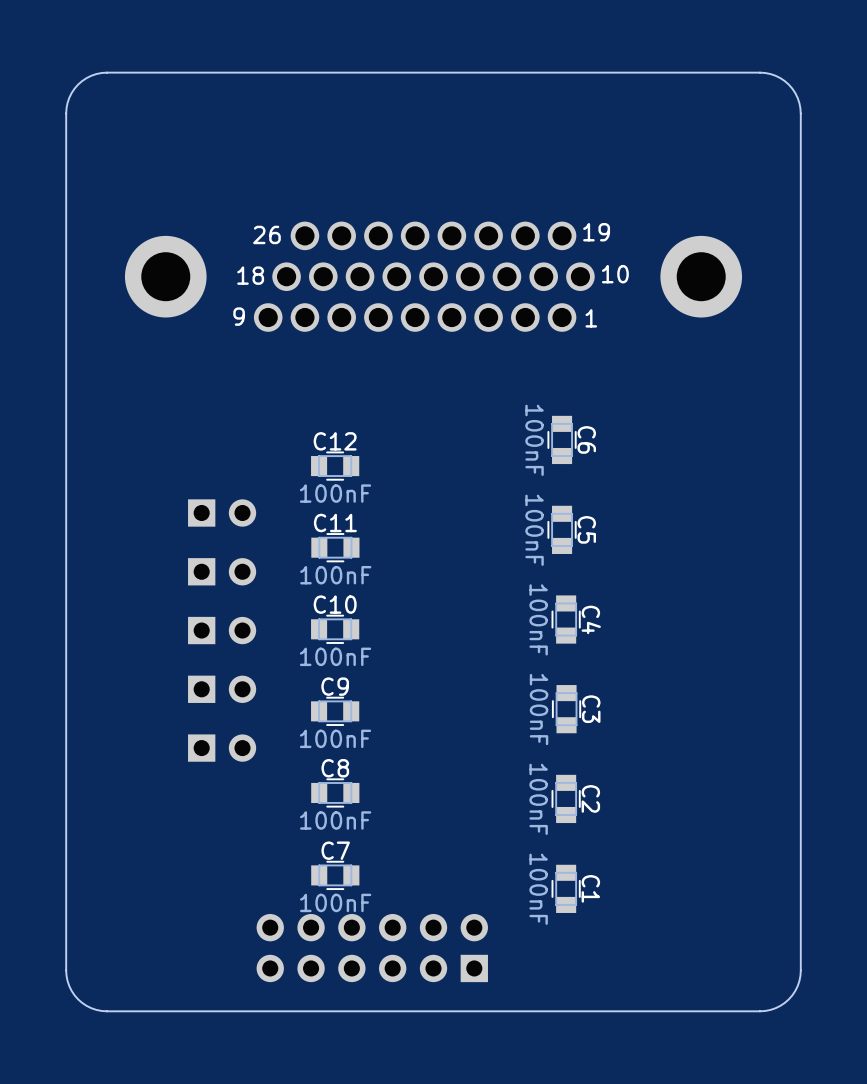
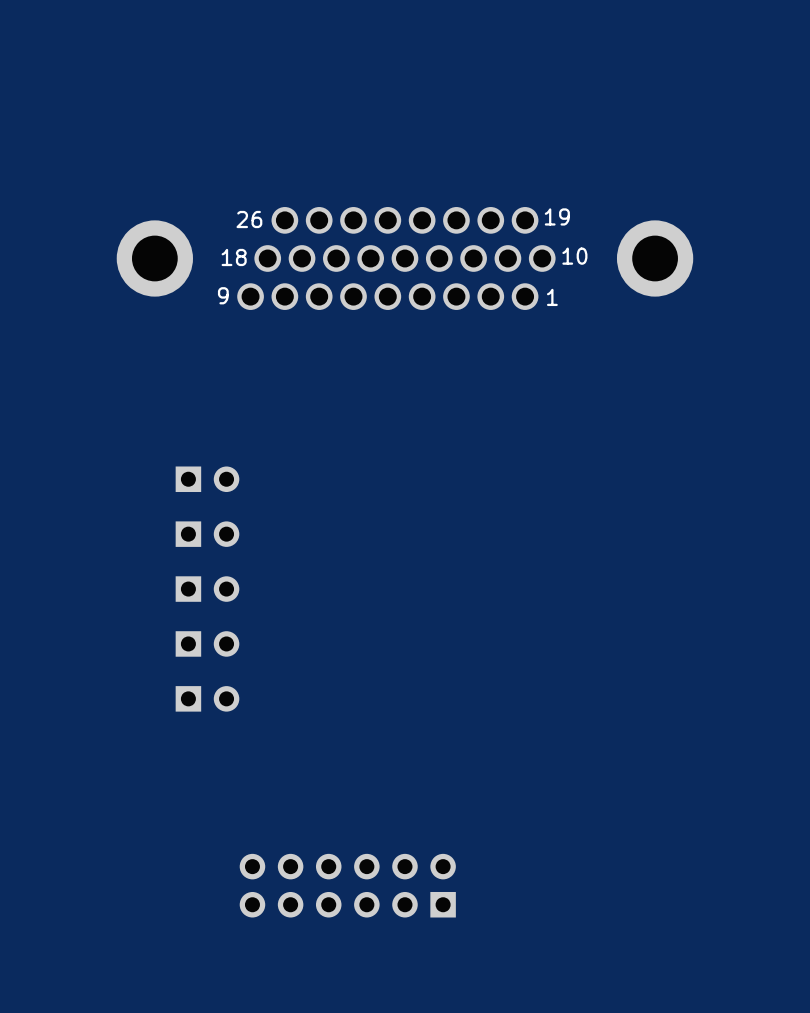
board edge: (759, 72) (107, 72) (91, 75) (74, 88) (67, 102) (66, 113) (66, 970) (71, 990) (82, 1002) (91, 1008) (107, 1011) (759, 1011) (780, 1005) (792, 995) (799, 981) (800, 970) (800, 113) (797, 97) (788, 84) (775, 75) (759, 72) -> none
C6: 100nF (562, 439) -> none
C12: 100nF (335, 466) -> none
C5: 100nF (562, 529) -> none
C11: 100nF (335, 547) -> none
C4: 100nF (566, 619) -> none
C10: 100nF (335, 629) -> none
C3: 100nF (566, 709) -> none
C9: 100nF (335, 711) -> none
C8: 100nF (335, 792) -> none
C2: 100nF (566, 798) -> none
C7: 100nF (335, 875) -> none
C1: 100nF (566, 888) -> none

